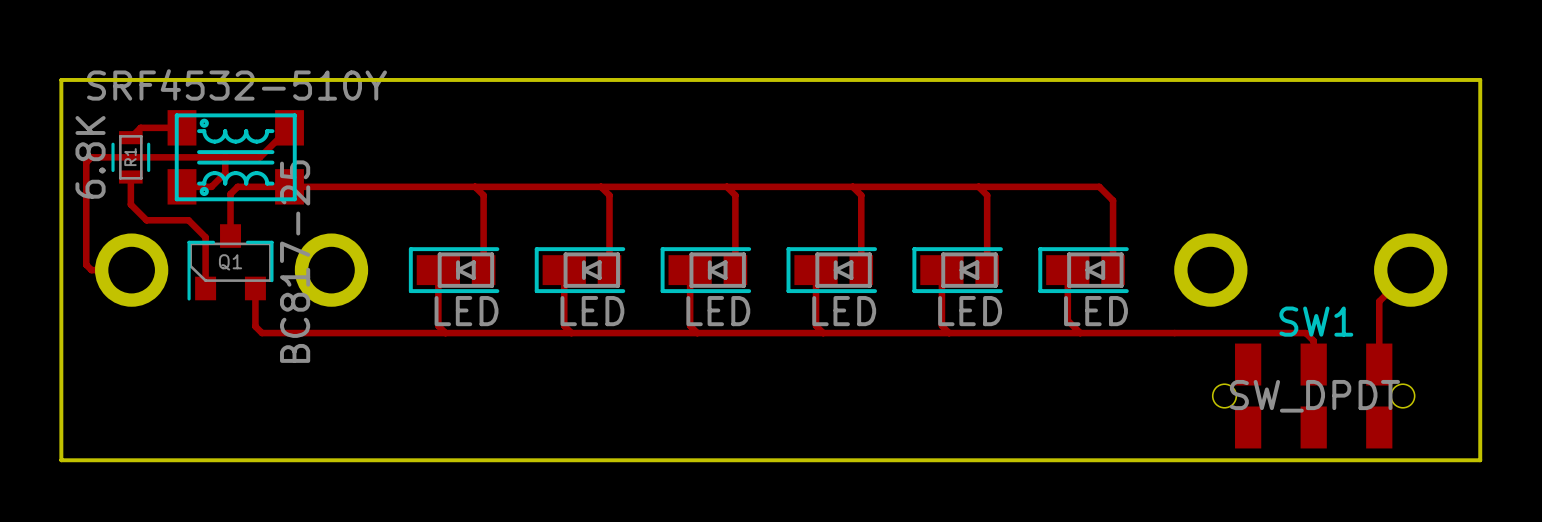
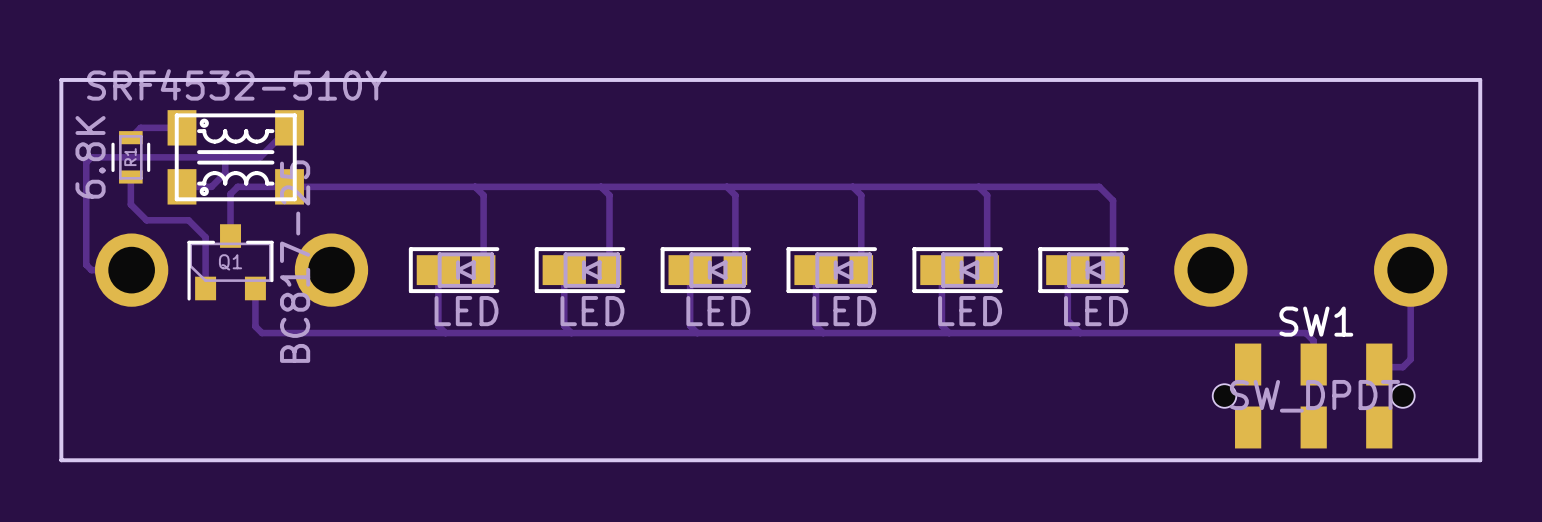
track: (1410, 270) (1379, 301) (1379, 364) -> (1410, 270) (1410, 359) (1402, 367) (1379, 367)

